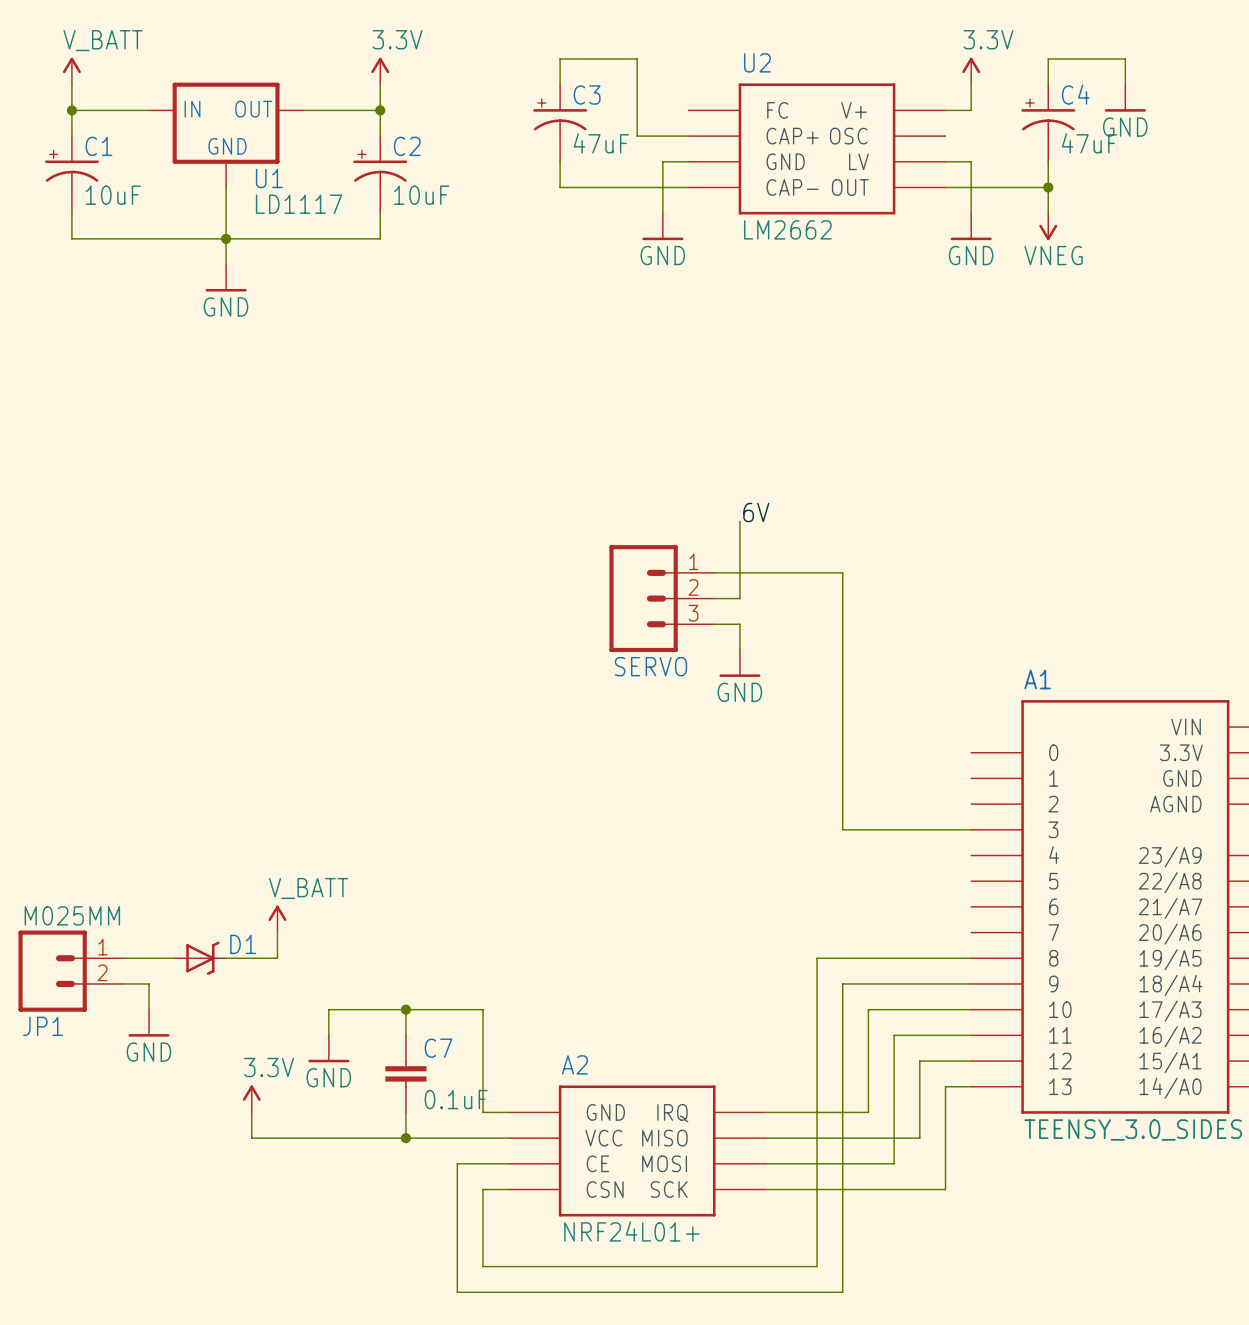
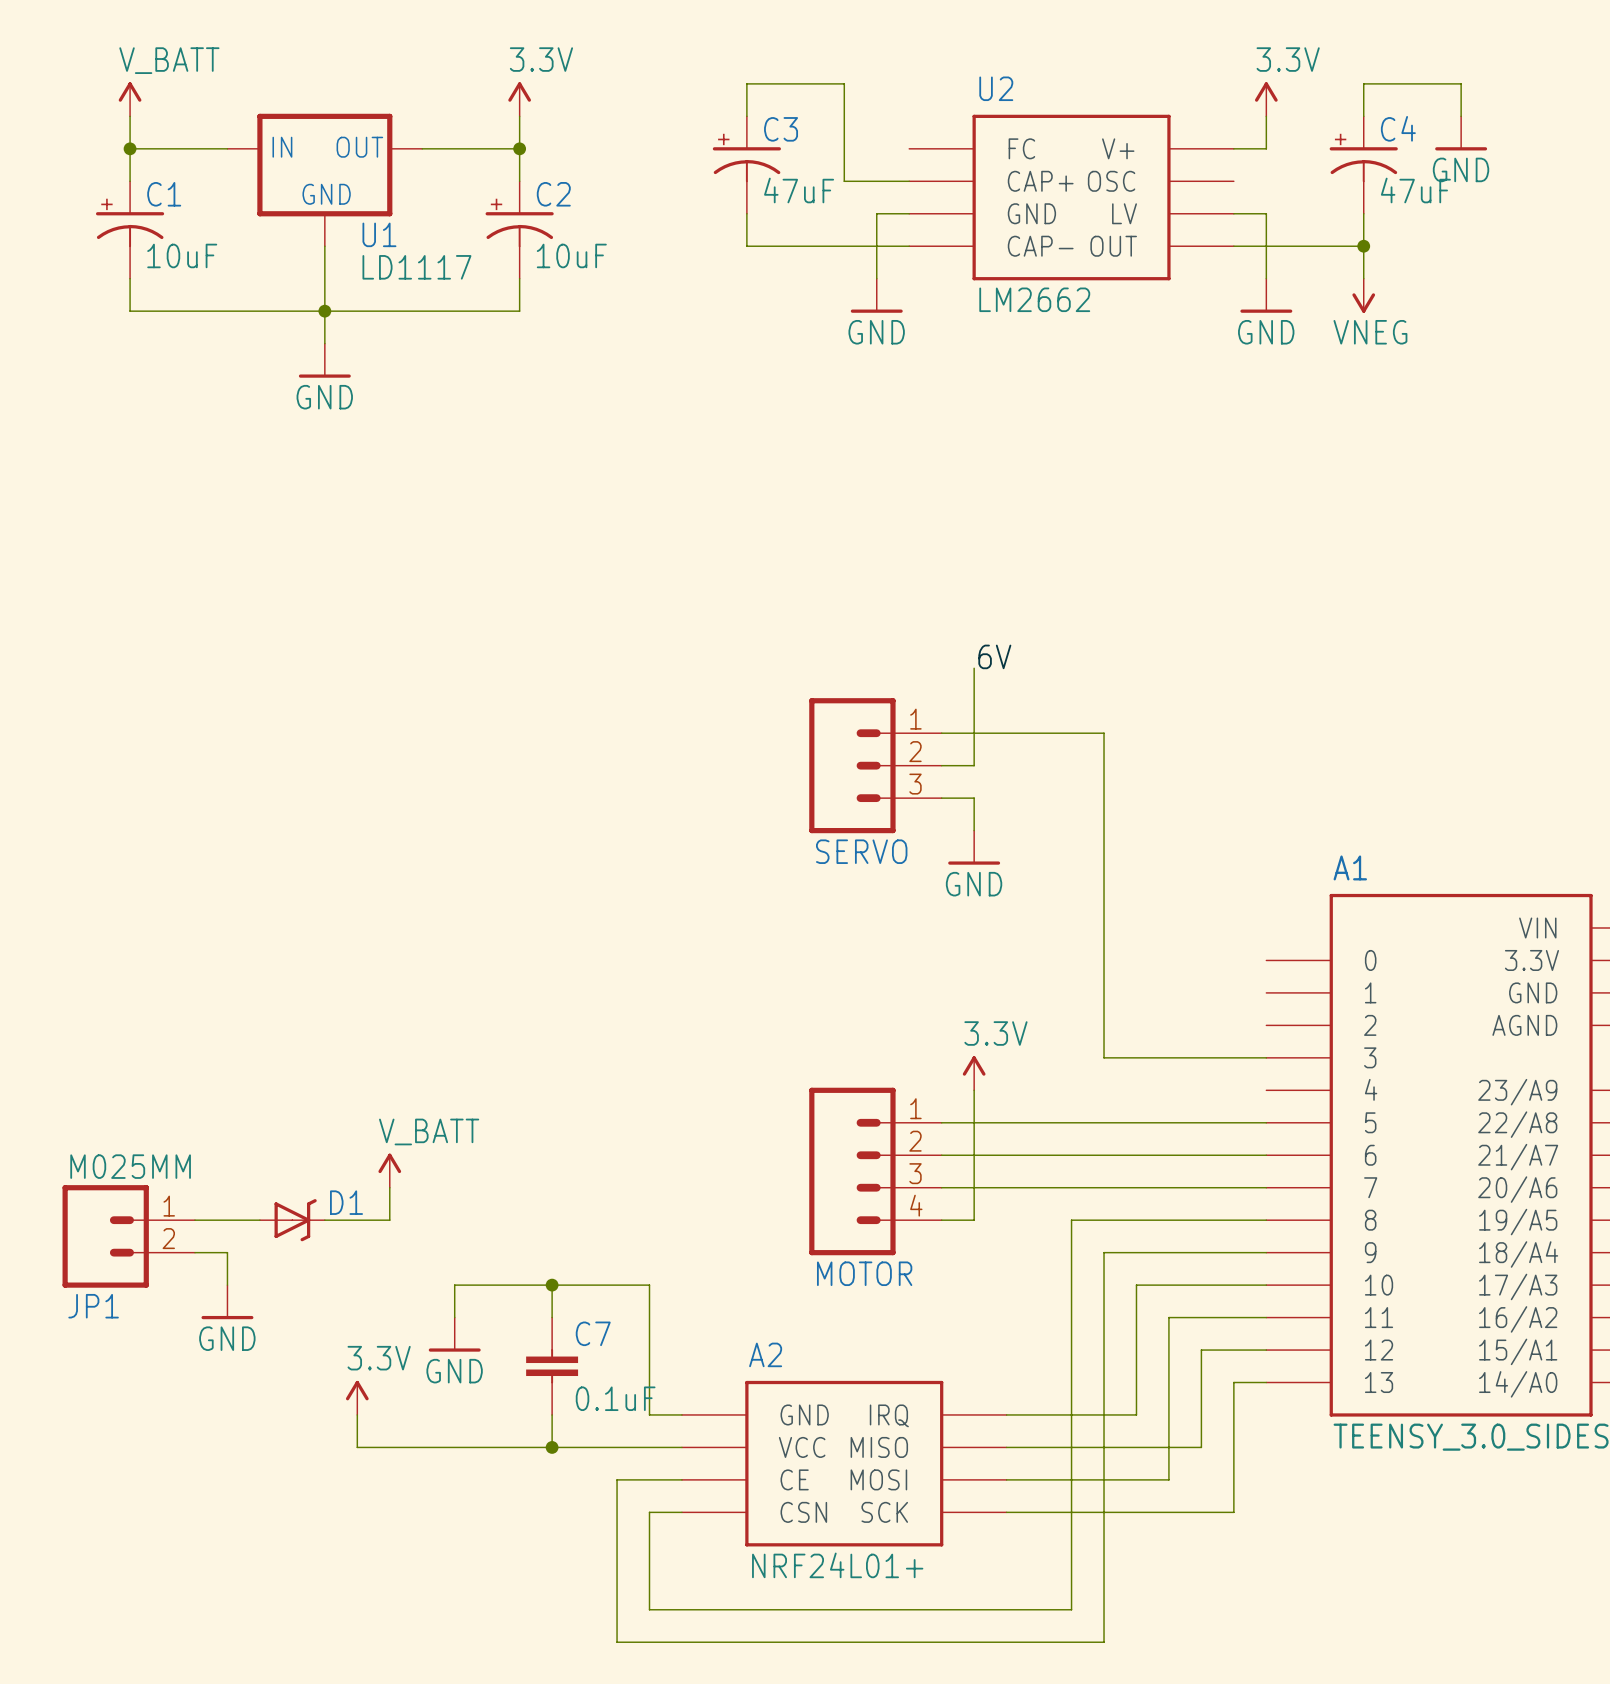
power symbol: none -> 3.3V (974, 1073)
wire: none -> (974, 1090) (974, 1220) (941, 1220)
wire: none -> (941, 1122) (1266, 1122)
wire: none -> (941, 1155) (1266, 1155)
MOTOR: none -> (875, 1171)
wire: none -> (941, 1187) (1266, 1187)

